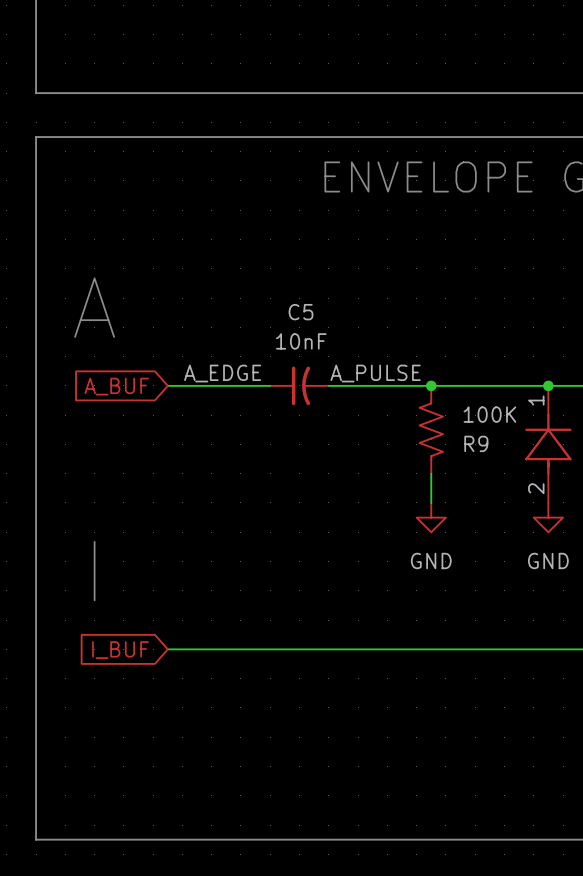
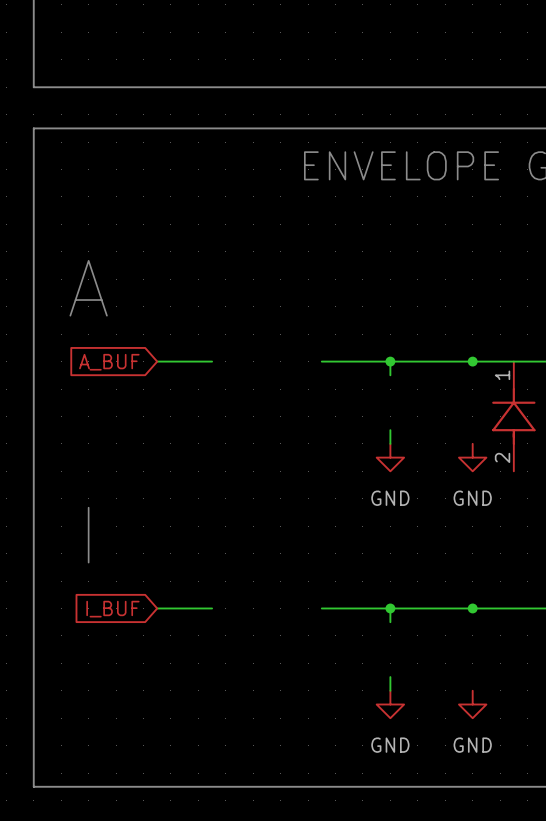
label: A_EDGE (222, 373) -> none
label: A_PULSE (375, 373) -> none
wire: (226, 385) (270, 385) -> none
C5: 10nF (299, 385) -> none
wire: (328, 385) (343, 385) -> none
wire: none -> (390, 361) (390, 375)
junction position: (431, 385) -> (390, 361)
junction: none -> (472, 361)
junction: (548, 385) -> none
R9: 100K (431, 429) -> none
wire: none -> (390, 430) (390, 443)
wire: (431, 473) (431, 502) -> none
power symbol: none -> GND (472, 457)
power symbol position: GND (431, 517) -> GND (390, 457)
power symbol: GND (548, 517) -> none
wire: (226, 649) (343, 649) -> none
wire: none -> (390, 608) (390, 622)
junction: none -> (390, 608)
junction: none -> (472, 608)
wire: none -> (390, 677) (390, 690)
power symbol: none -> GND (390, 704)
power symbol: none -> GND (472, 704)

